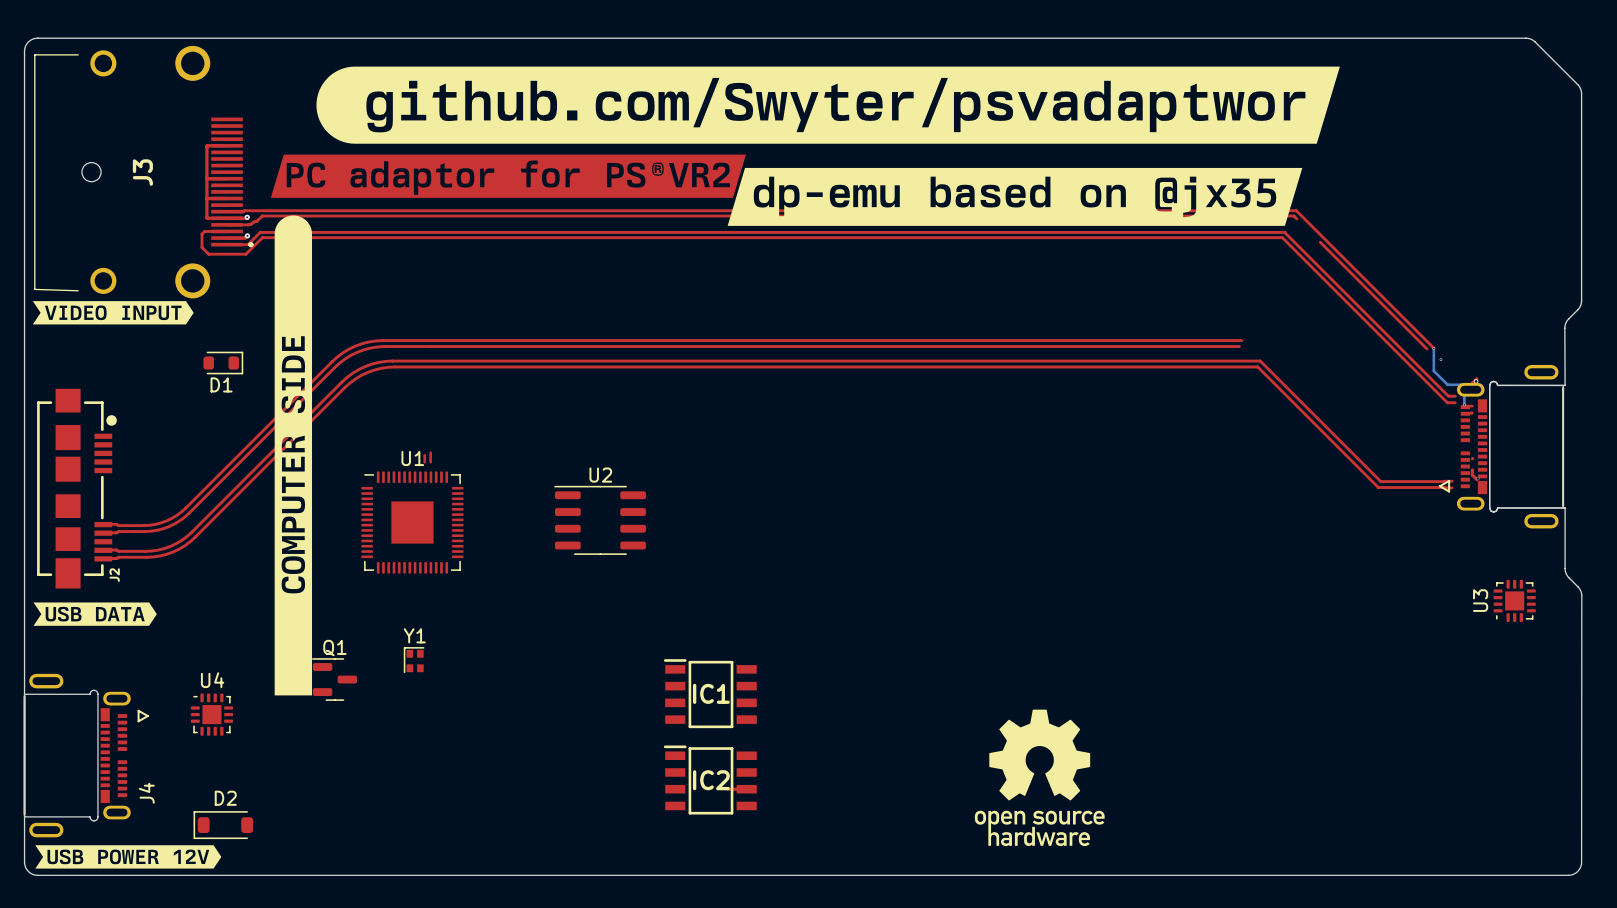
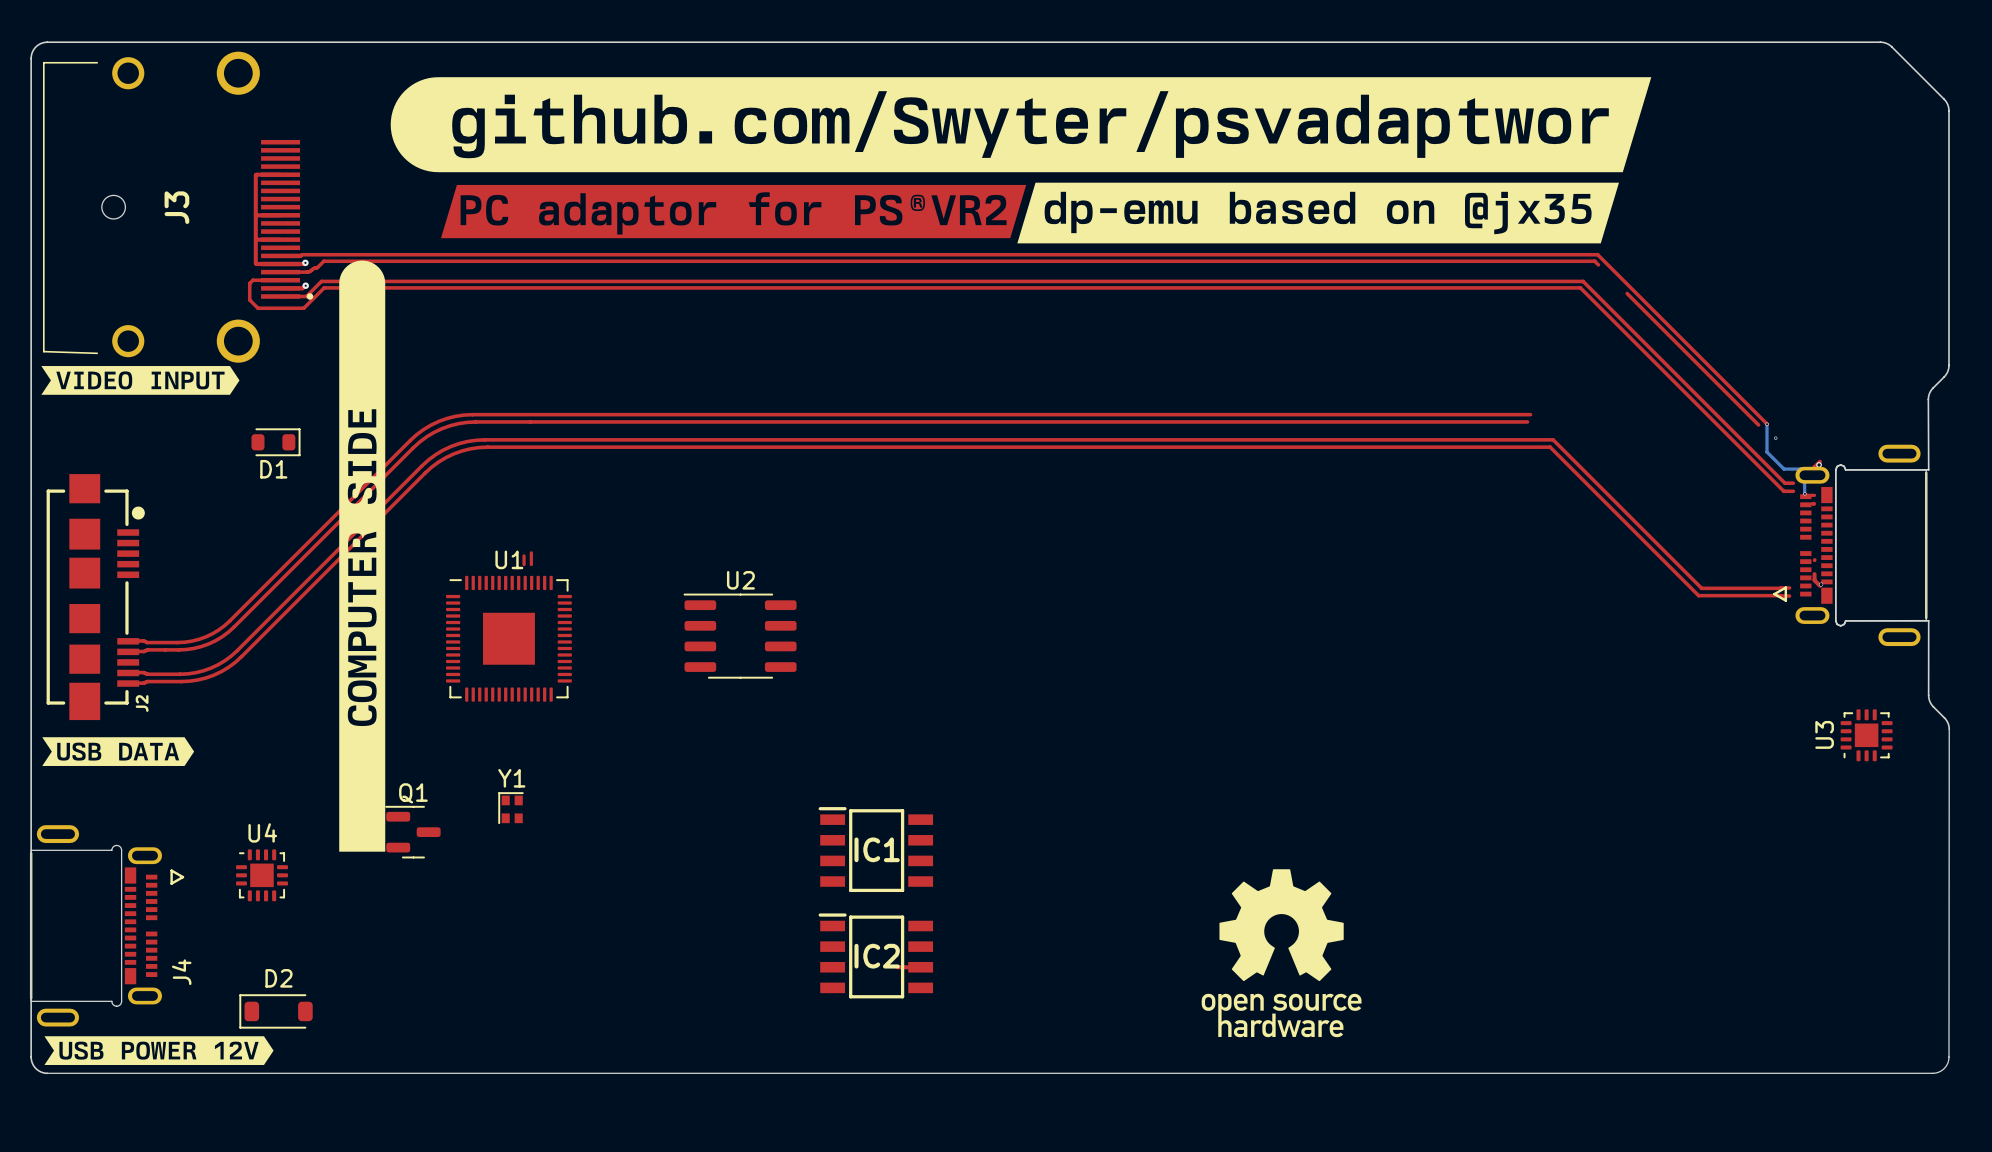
drawing: none -> [1017, 182, 1619, 244]
drawing: [727, 167, 1303, 226] -> none
drawing position: (508, 176) -> (733, 211)

